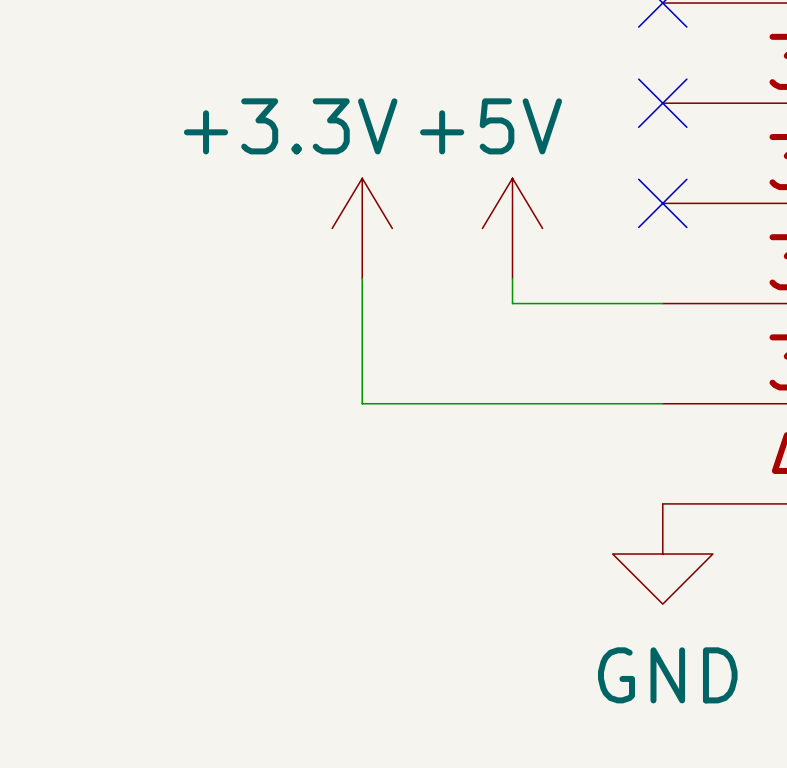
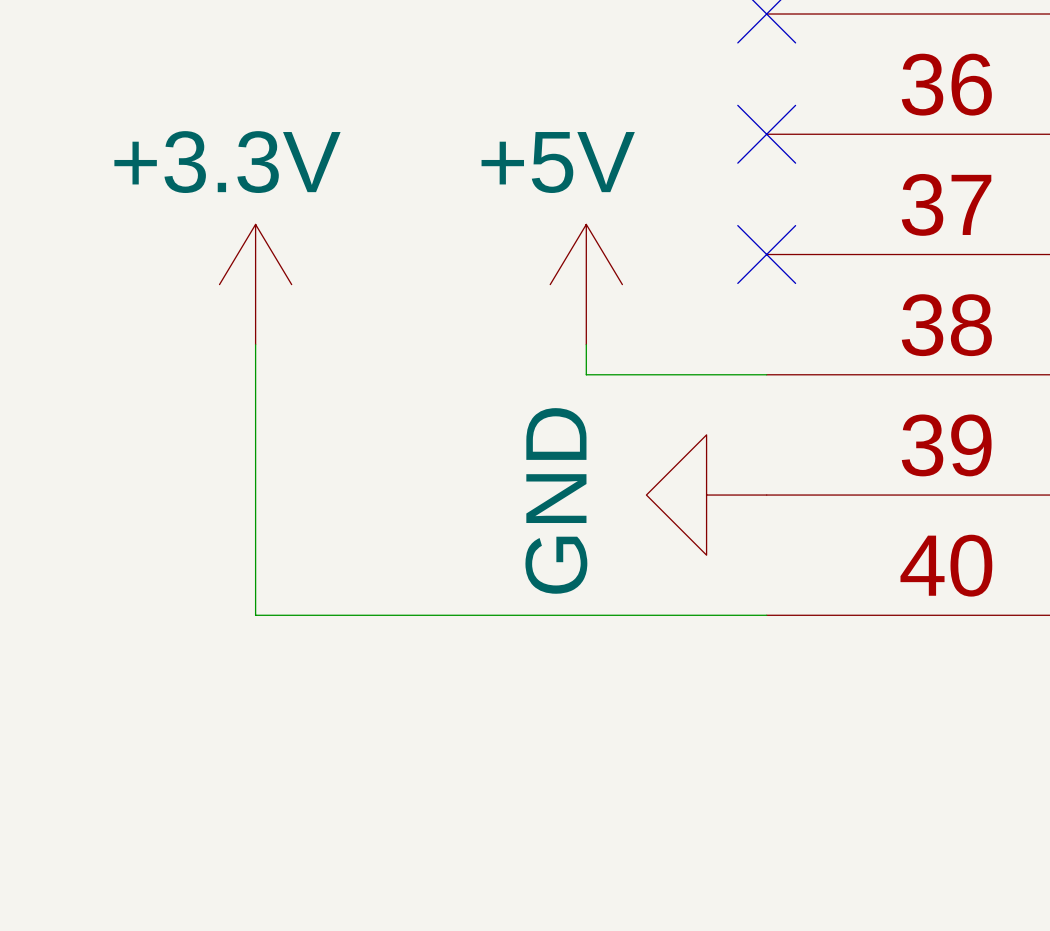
power symbol text position: +3.3V (290, 126) -> +3.3V (227, 162)
power symbol position: +3.3V (362, 228) -> +3.3V (255, 284)
wire: none -> (255, 344) (255, 615) (766, 615)
wire: (362, 278) (362, 403) (662, 403) -> none
power symbol rotation: 0° (662, 554) -> 90° clockwise (706, 495)
power symbol position: GND (662, 554) -> GND (706, 495)

